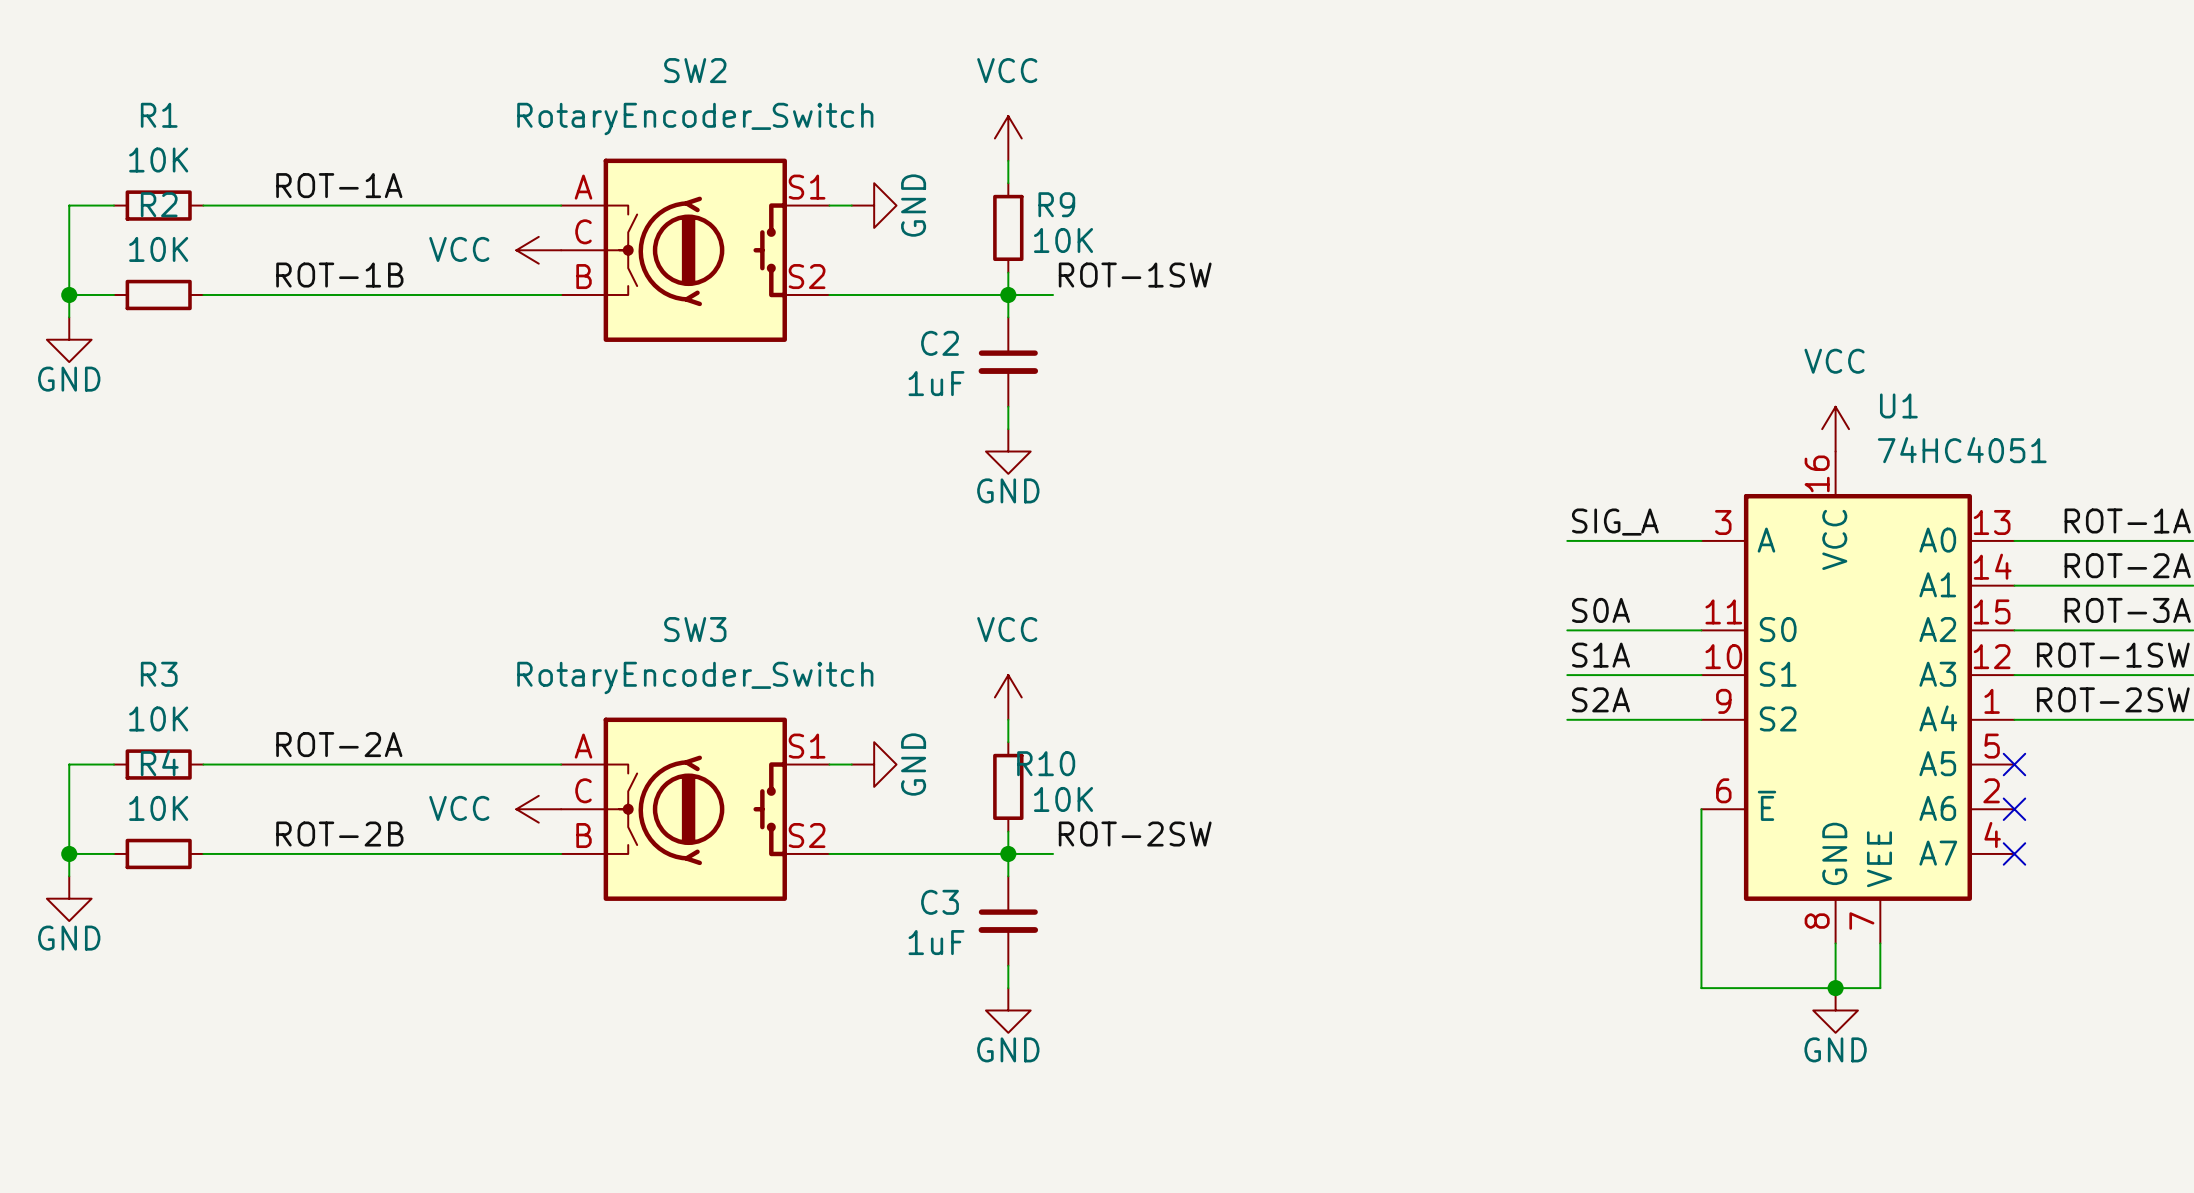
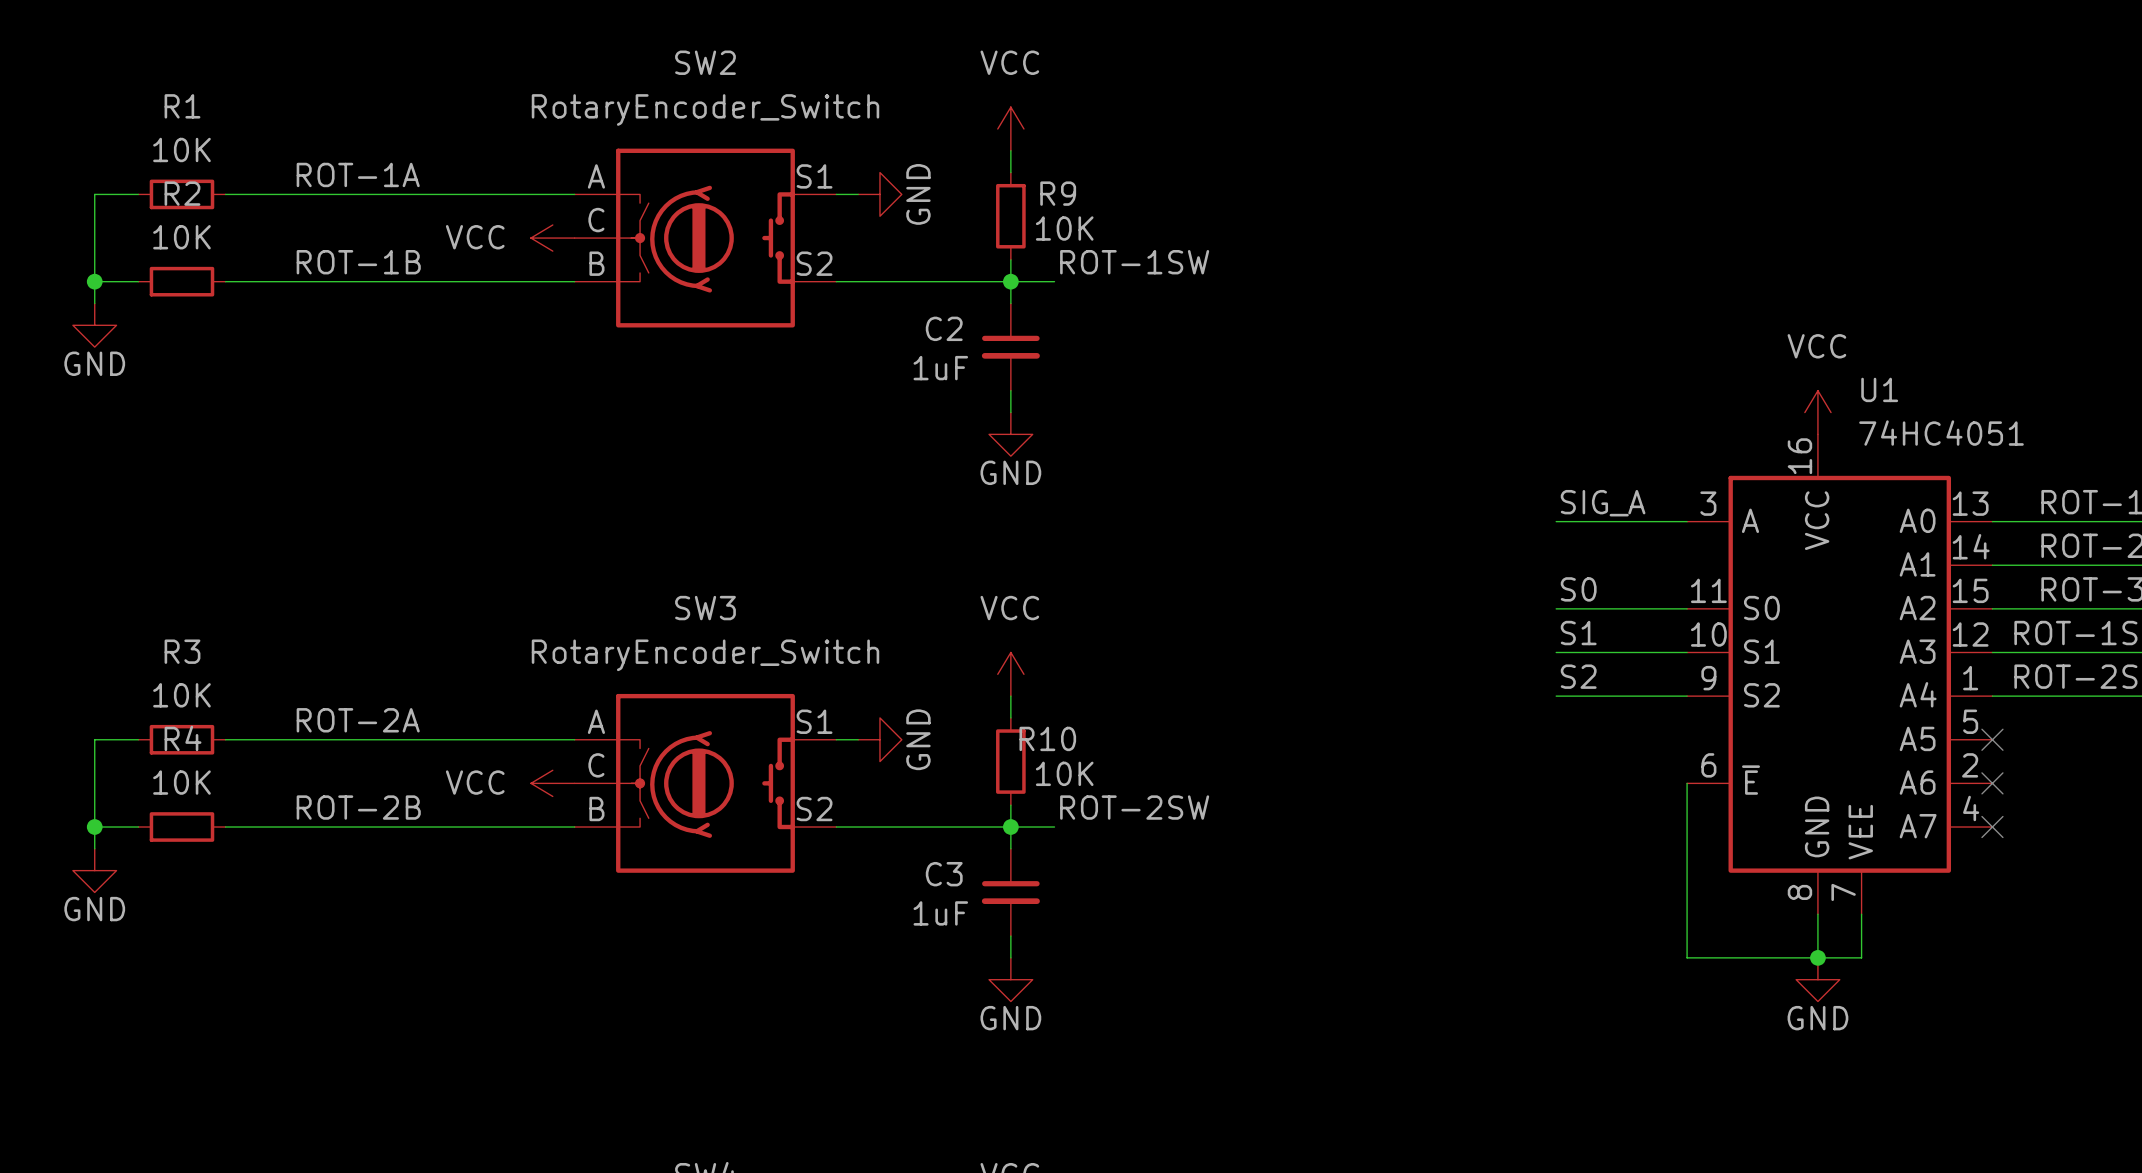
label: S0A (1601, 610) -> S0 (1578, 589)
label: S1A (1601, 655) -> S1 (1578, 633)
label: S2A (1601, 699) -> S2 (1578, 676)

